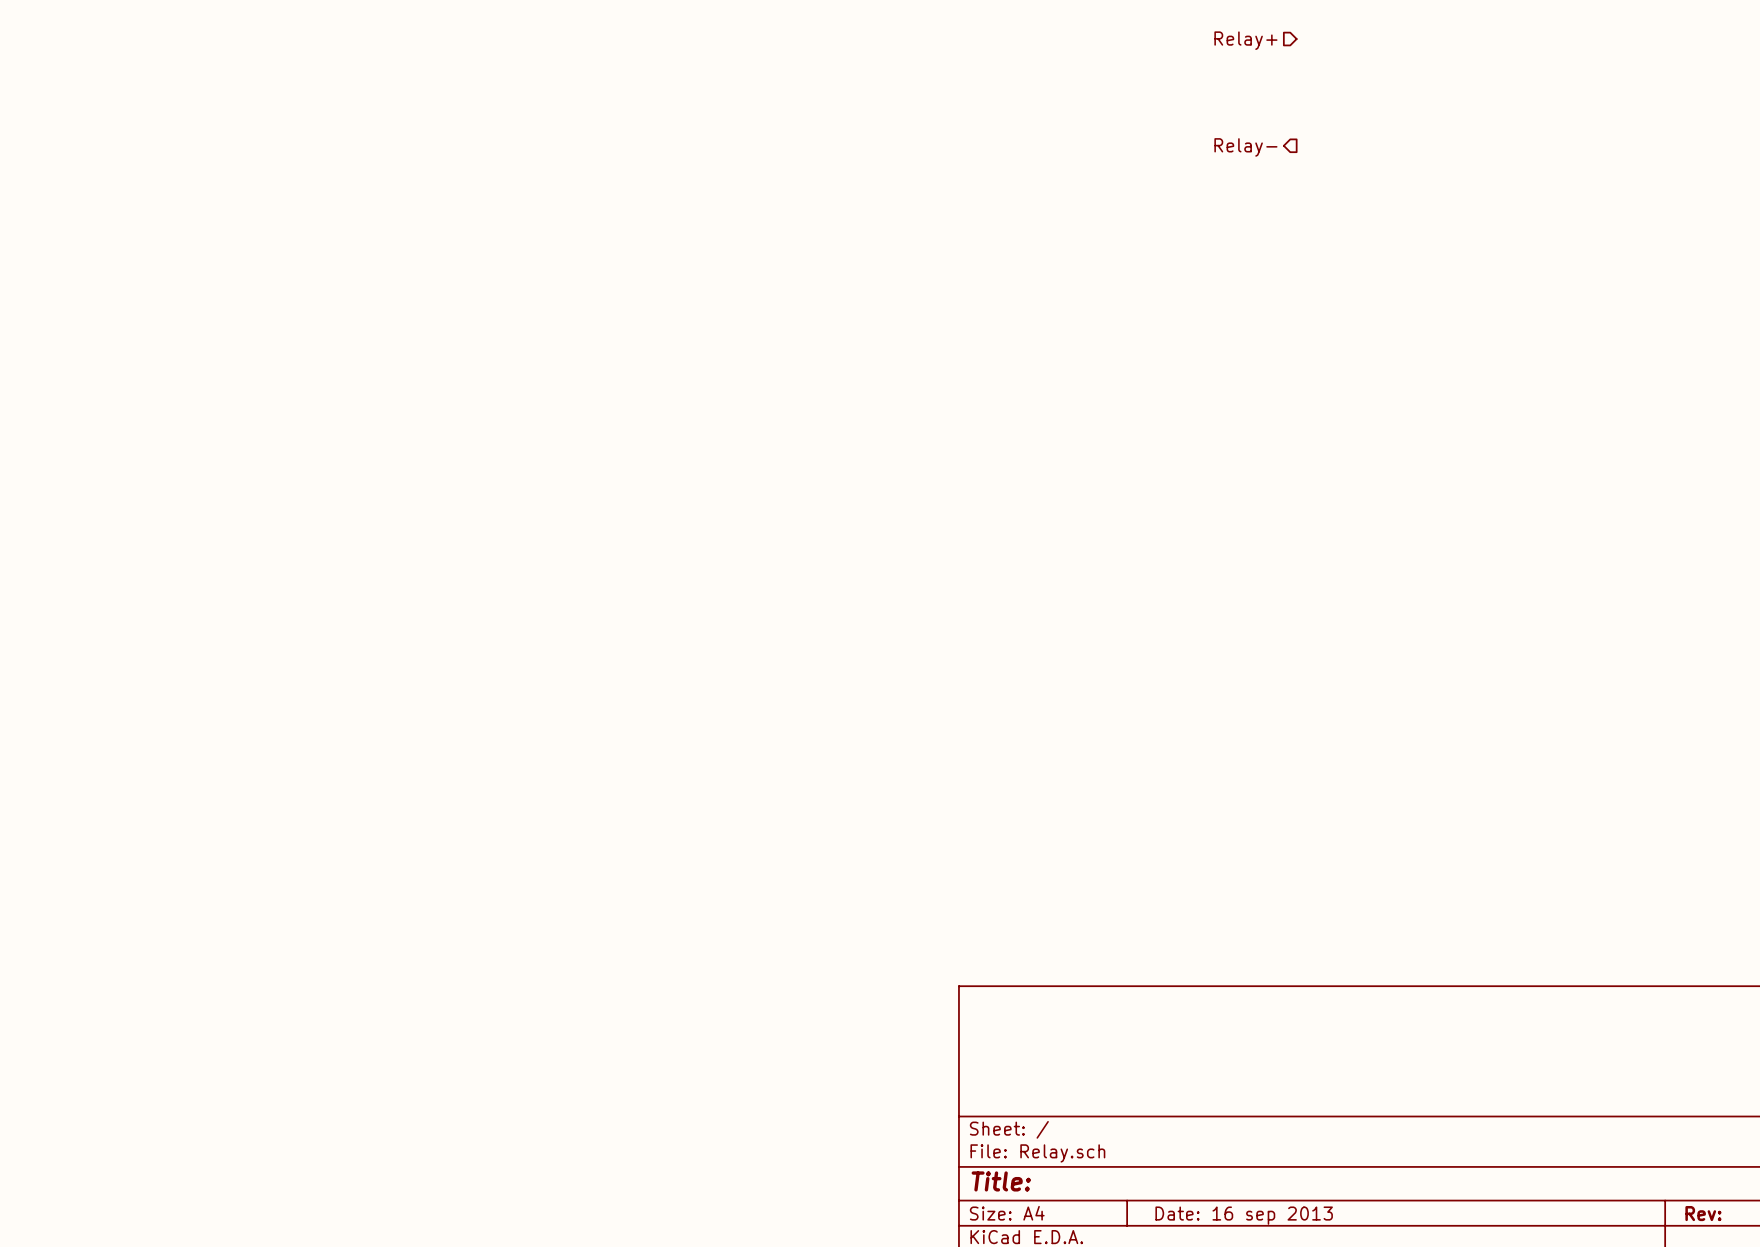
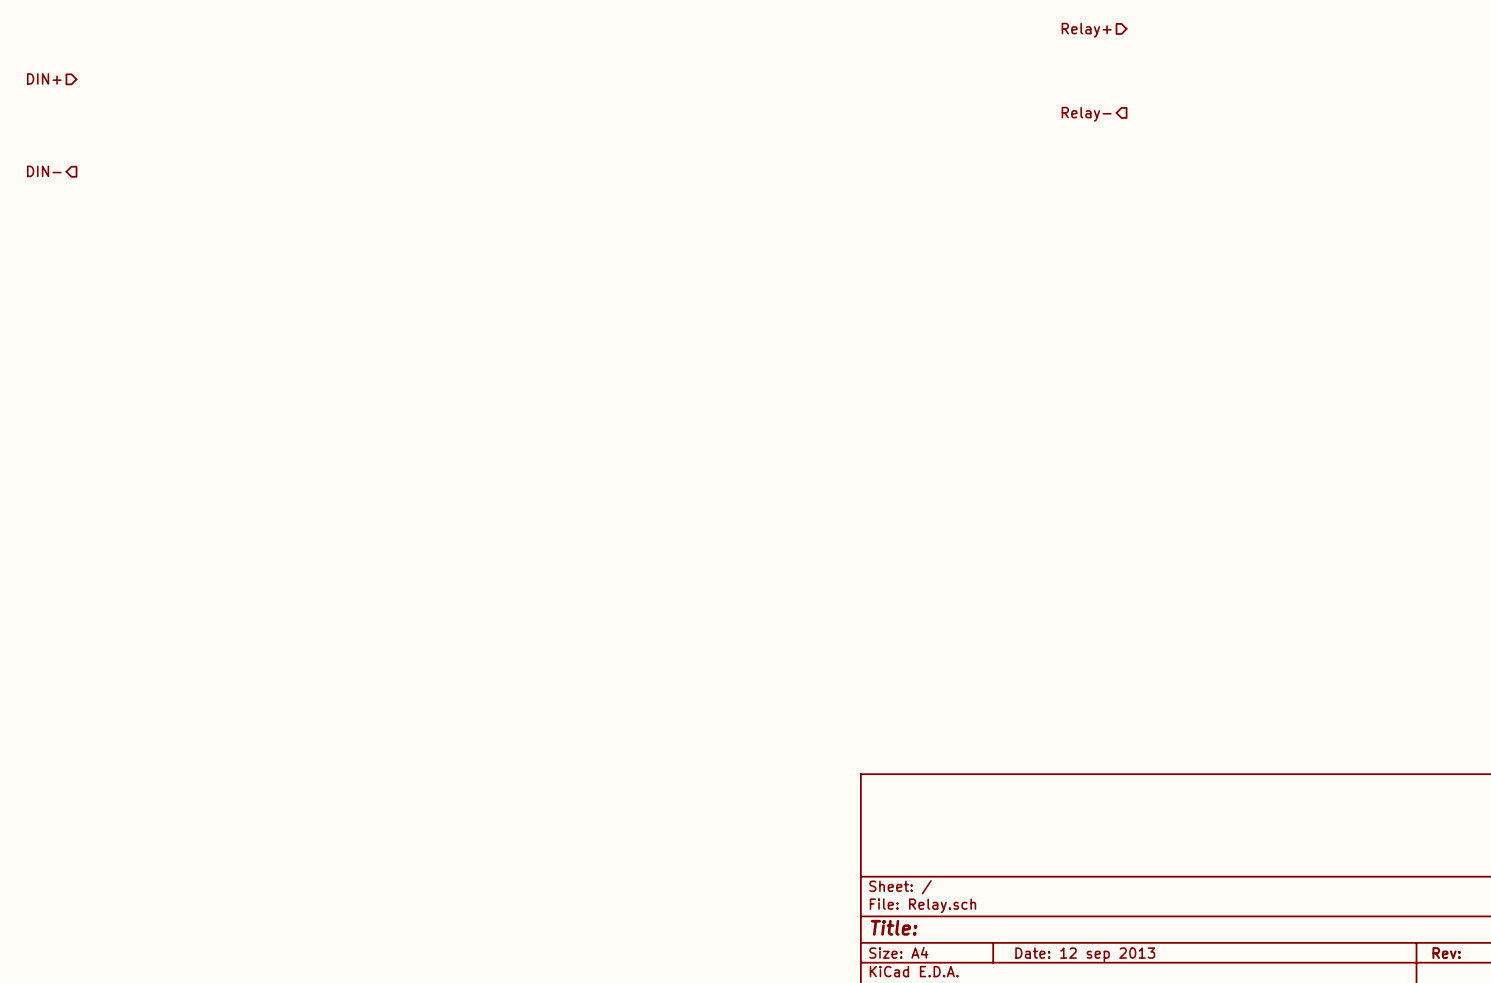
title block: Date: 16 sep 2013 (1244, 1215) -> Date: 12 sep 2013 (1085, 954)

